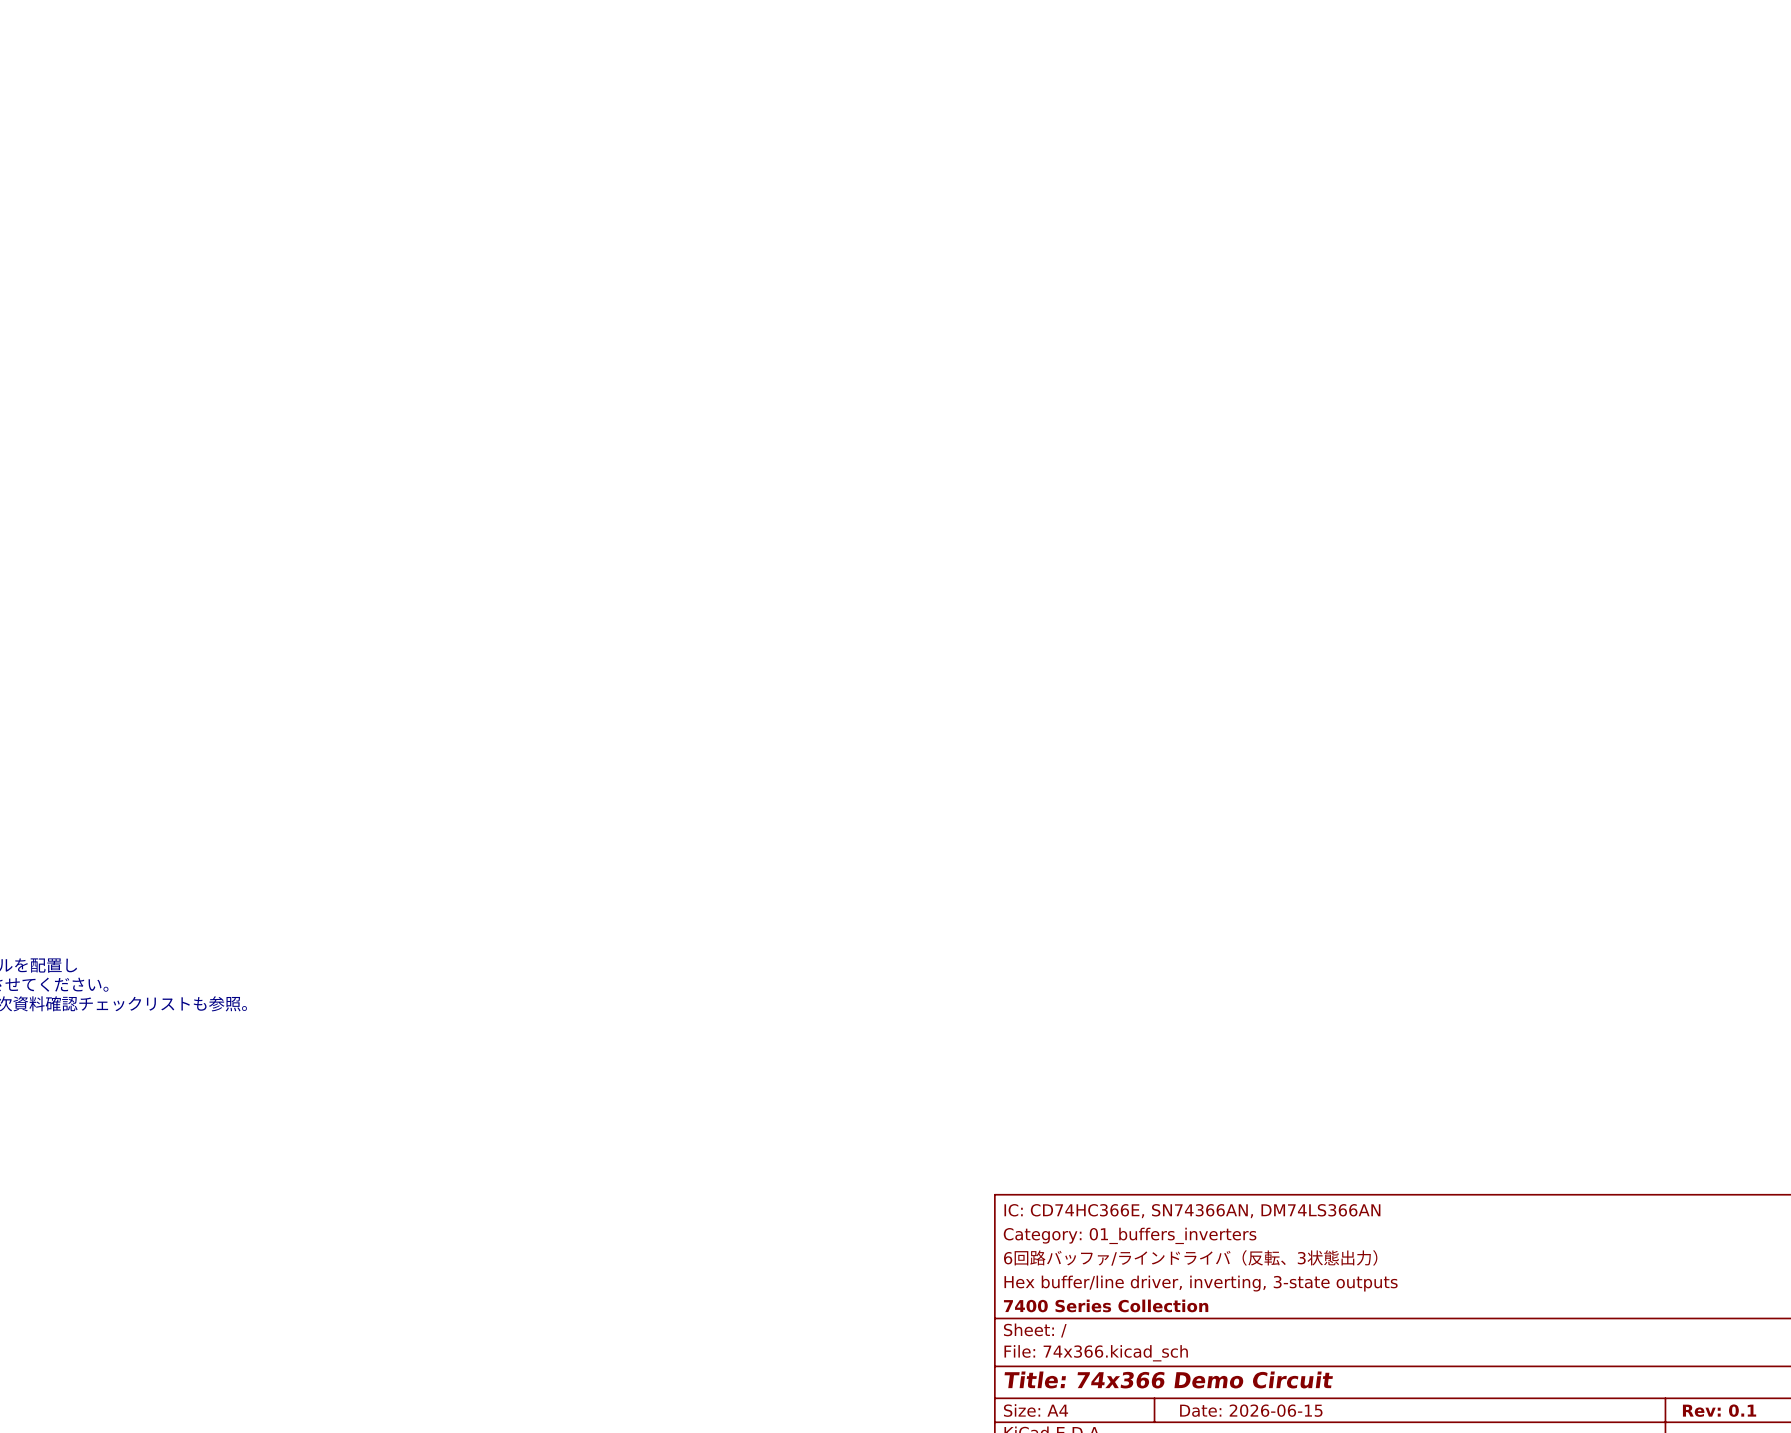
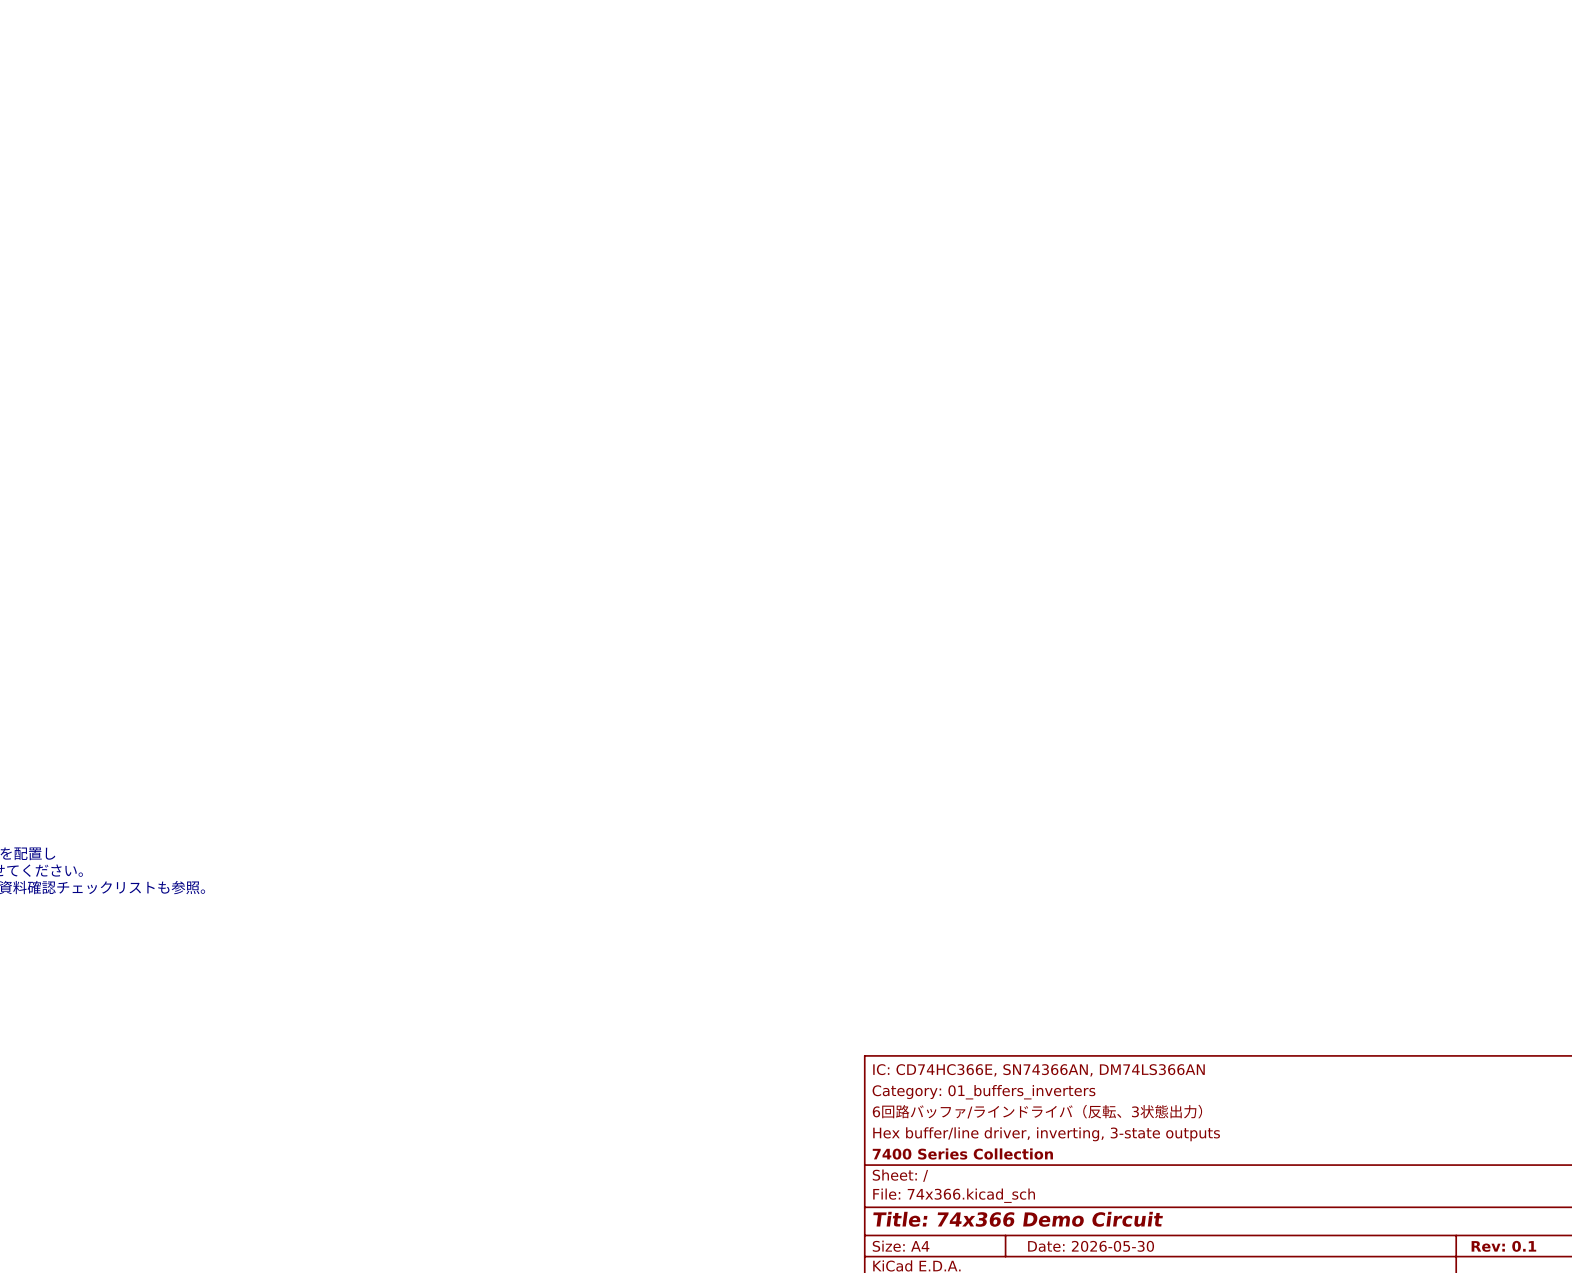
title block: Date: 2026-06-15 (1251, 1410) -> Date: 2026-05-30 (1091, 1246)

